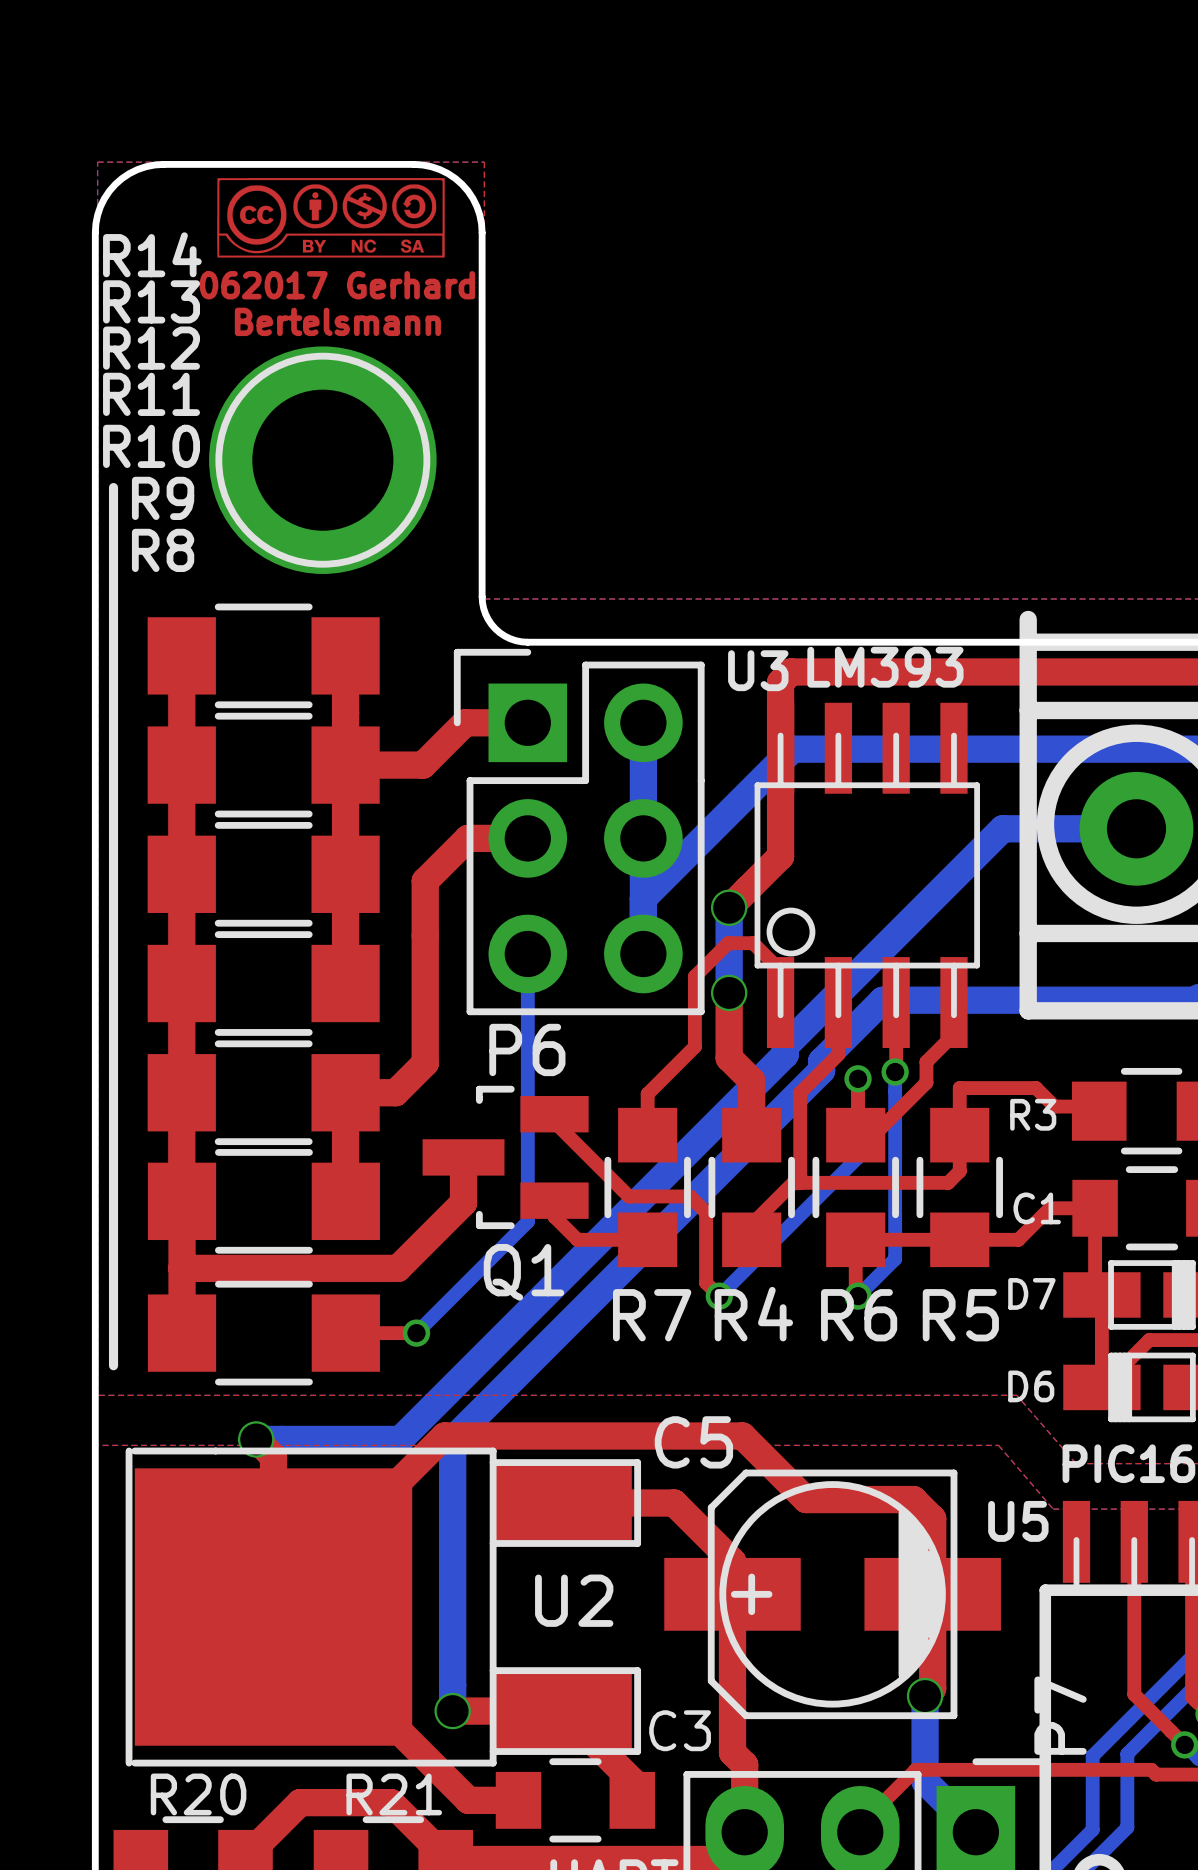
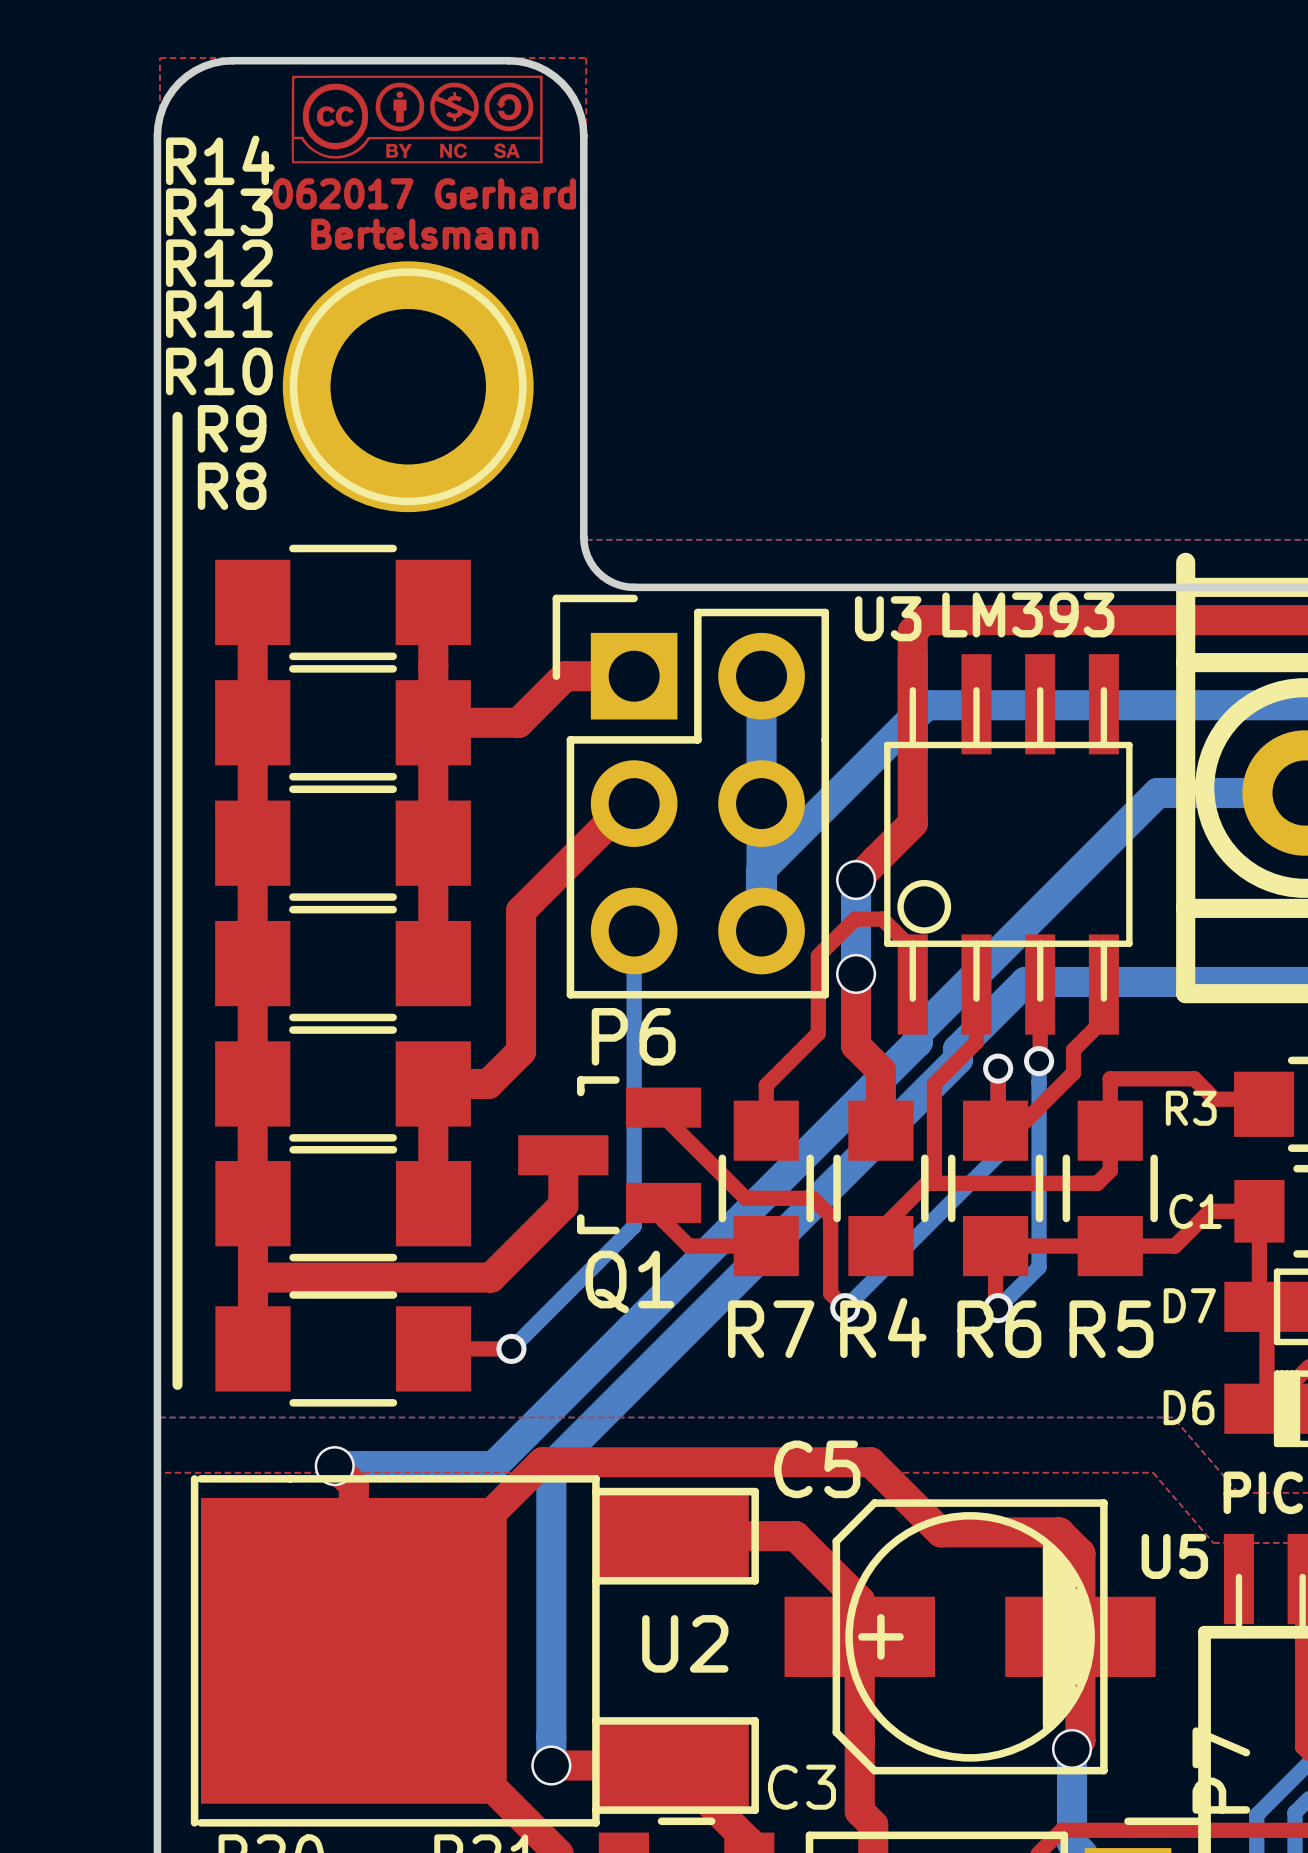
top track: (522, 838) (467, 838) (425, 881) (425, 935) -> (628, 803) (521, 910)

